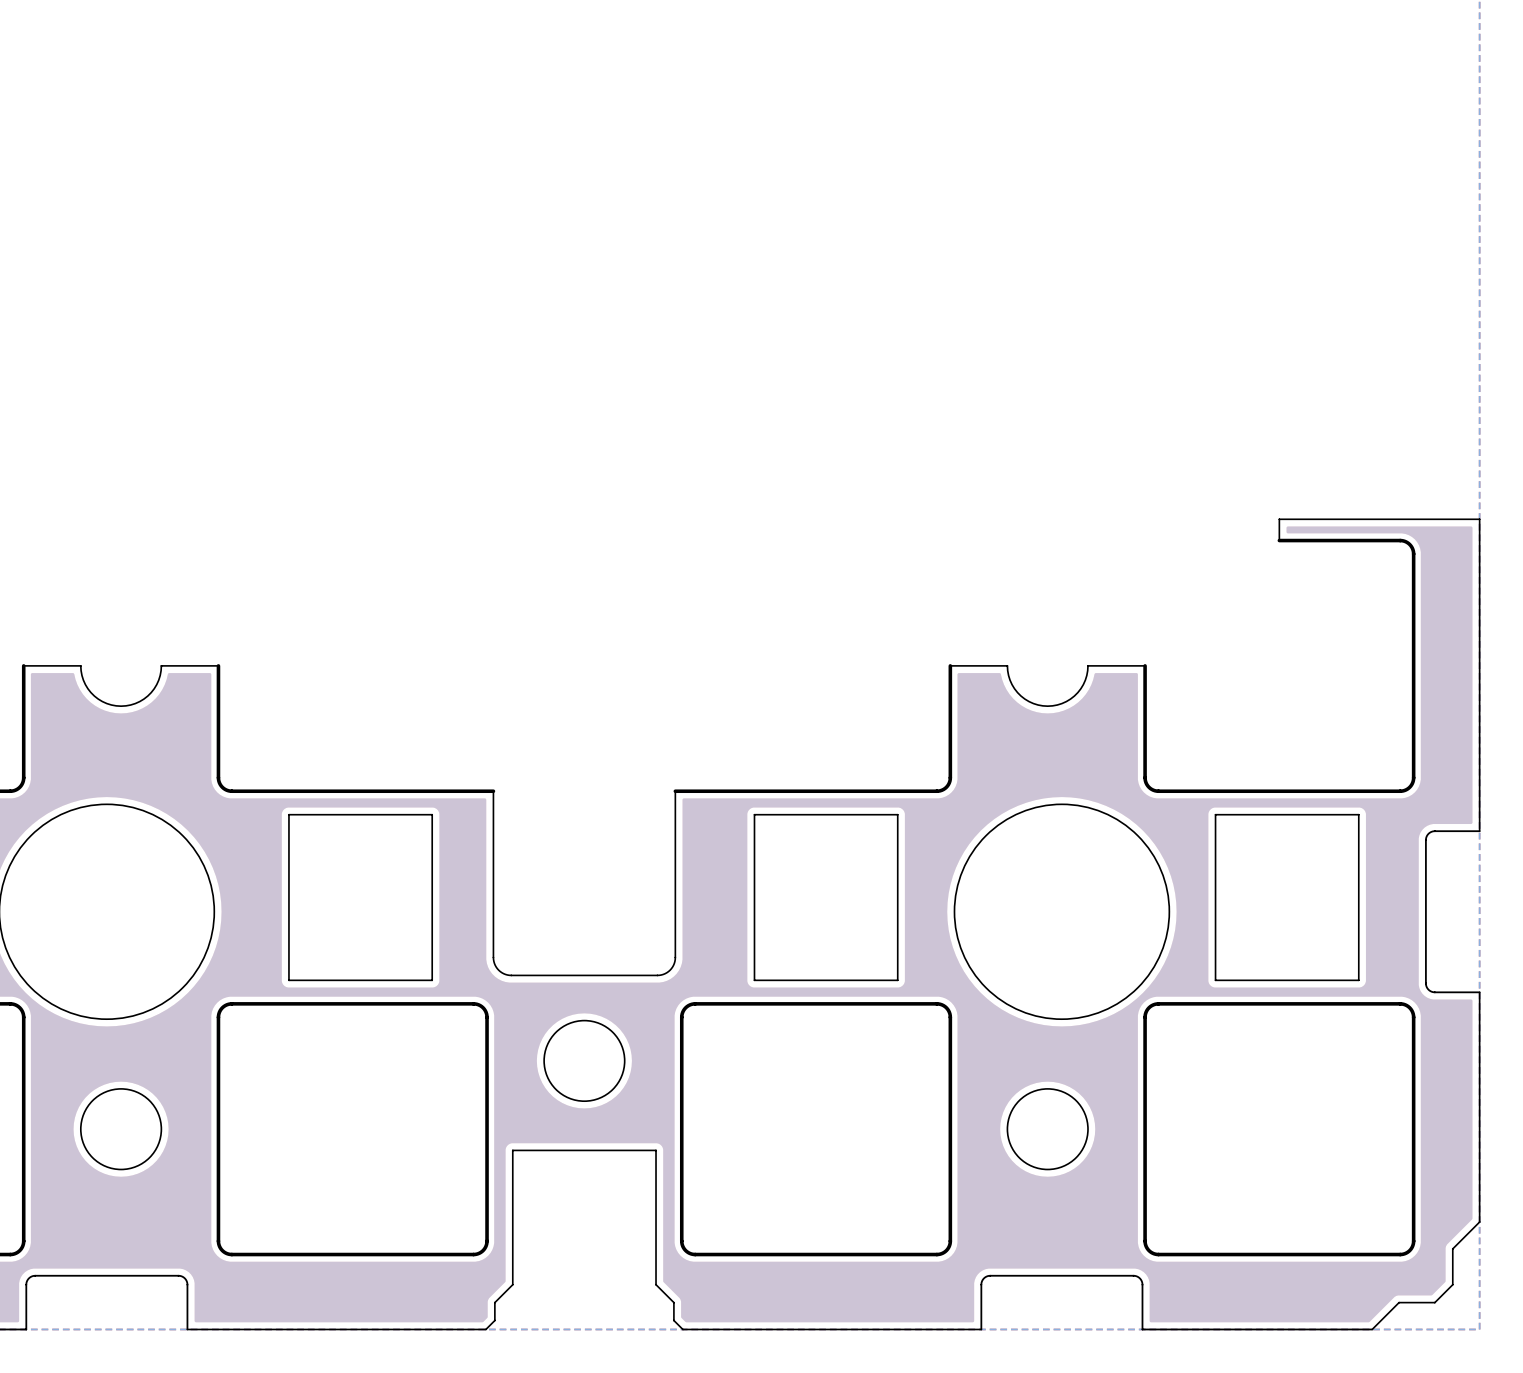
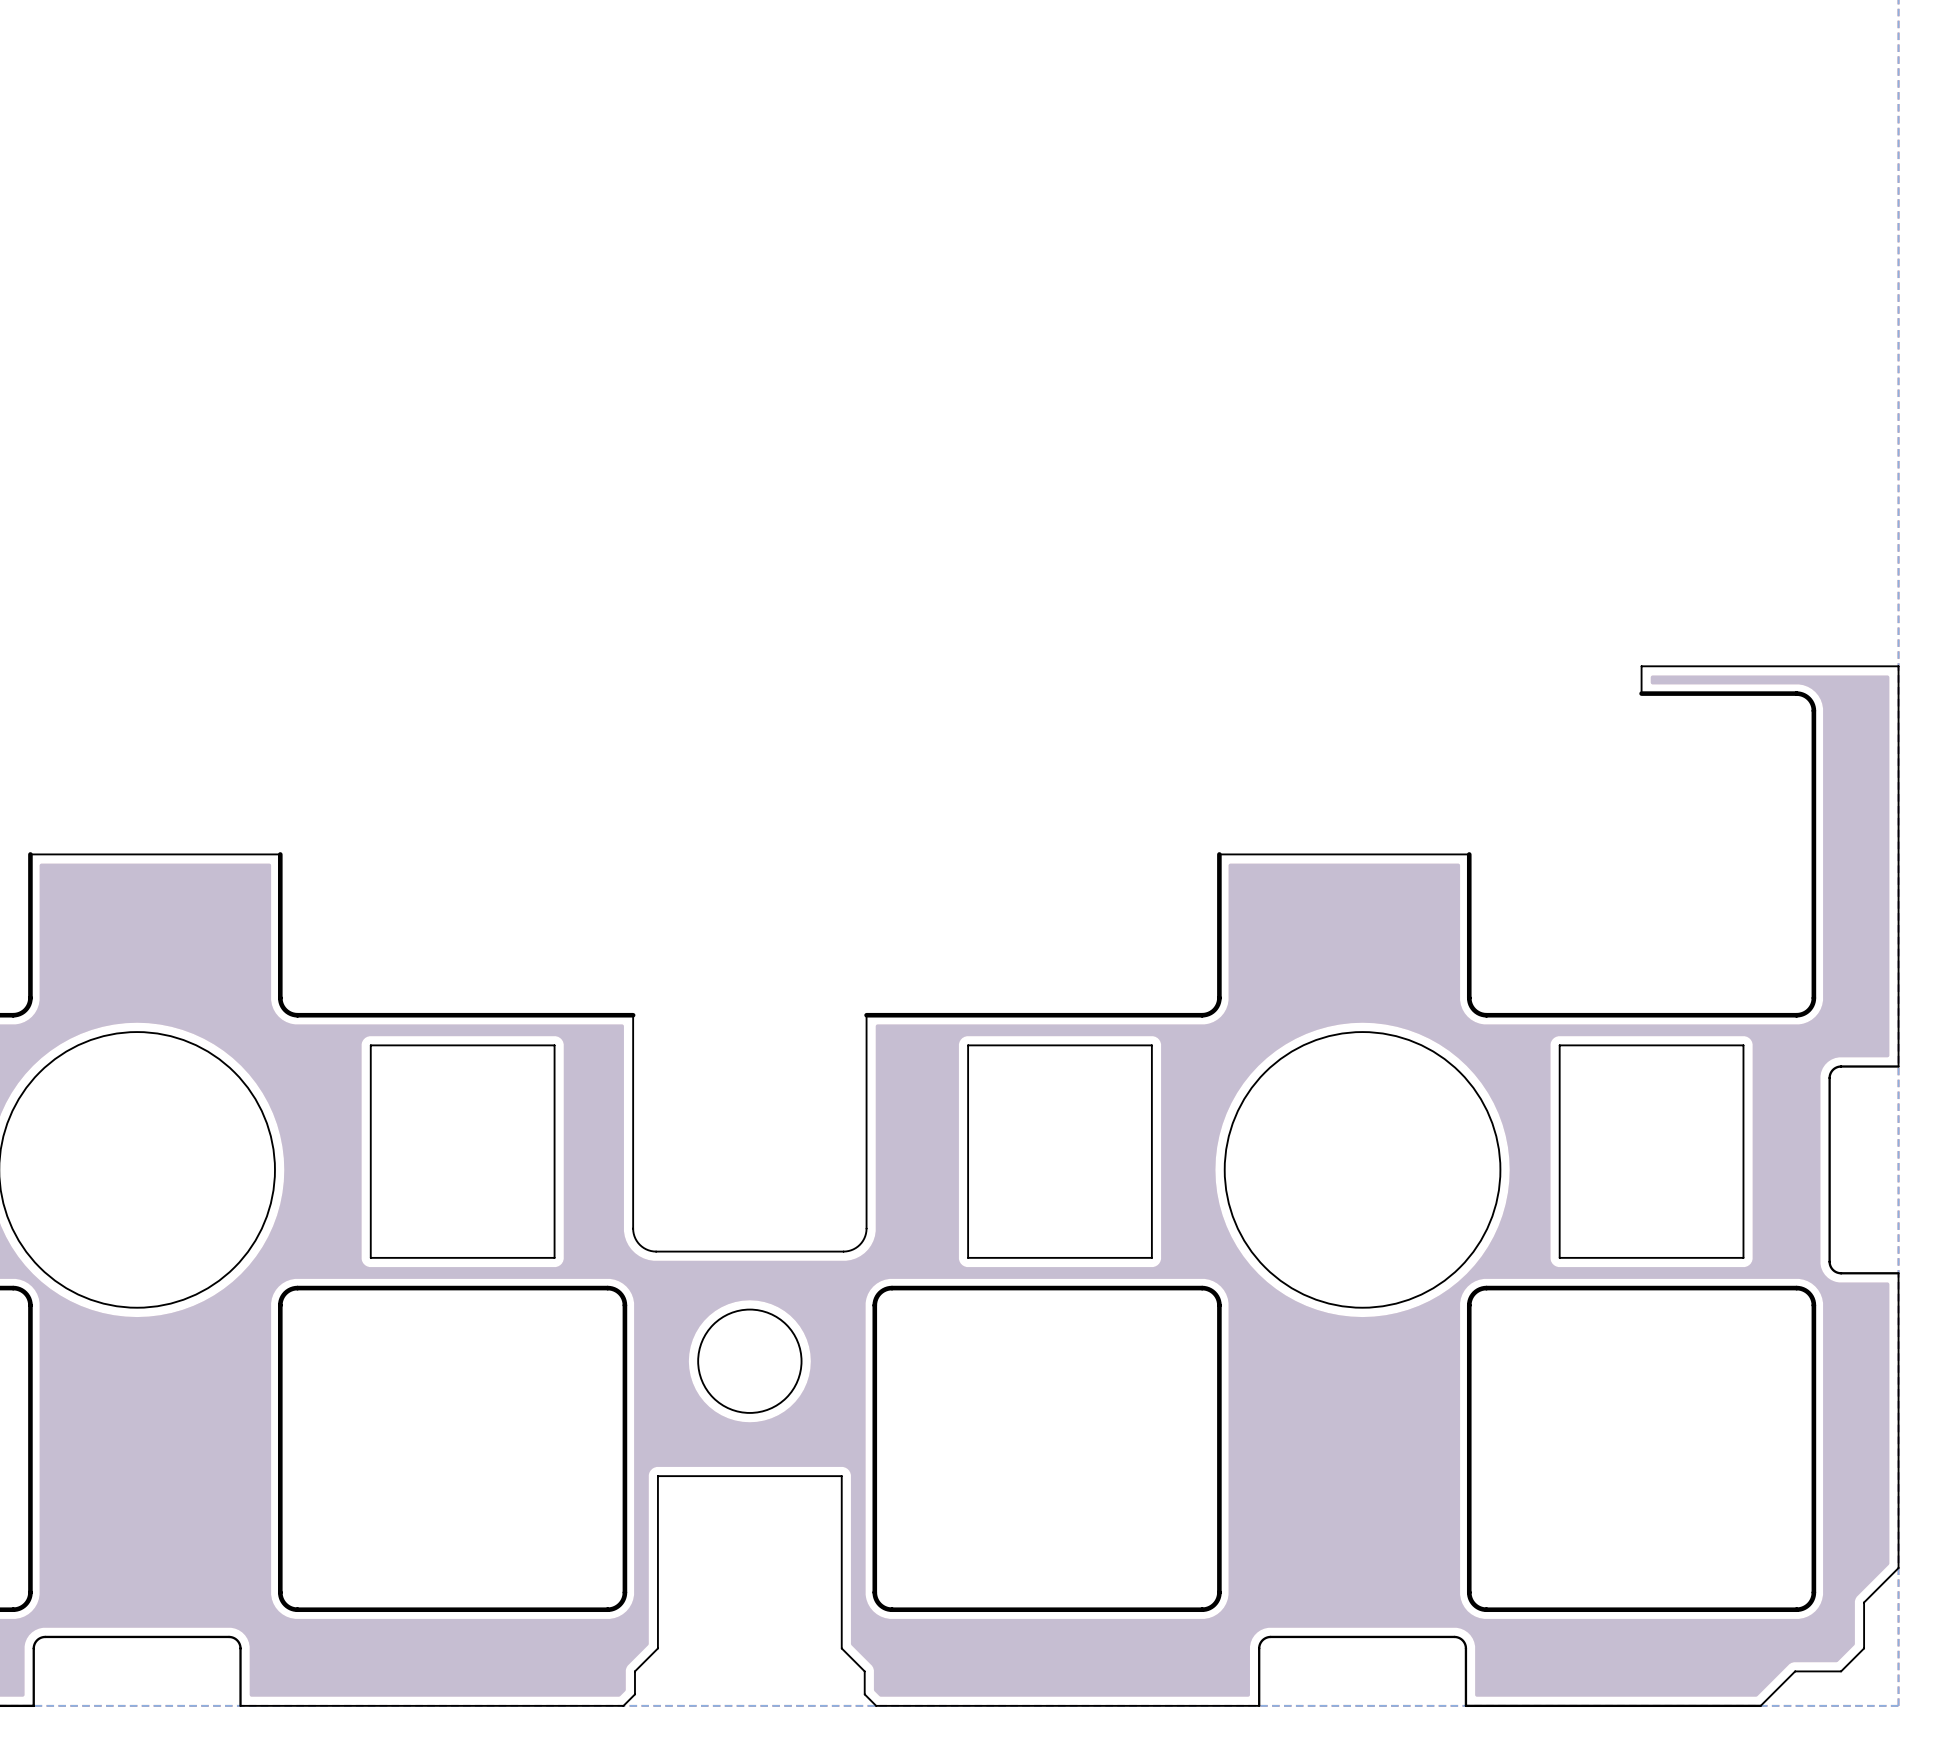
board edge: (161, 665) (158, 680) (151, 692) (139, 701) (121, 706) (102, 701) (90, 692) (83, 680) (80, 665) -> (207, 854) (103, 854)
board edge: (1087, 665) (1085, 680) (1077, 692) (1061, 703) (1047, 706) (1033, 703) (1017, 692) (1010, 680) (1007, 665) -> (1396, 854) (1292, 854)
round board edge: [80, 1088, 162, 1170] -> none
round board edge: [1006, 1088, 1089, 1170] -> none

